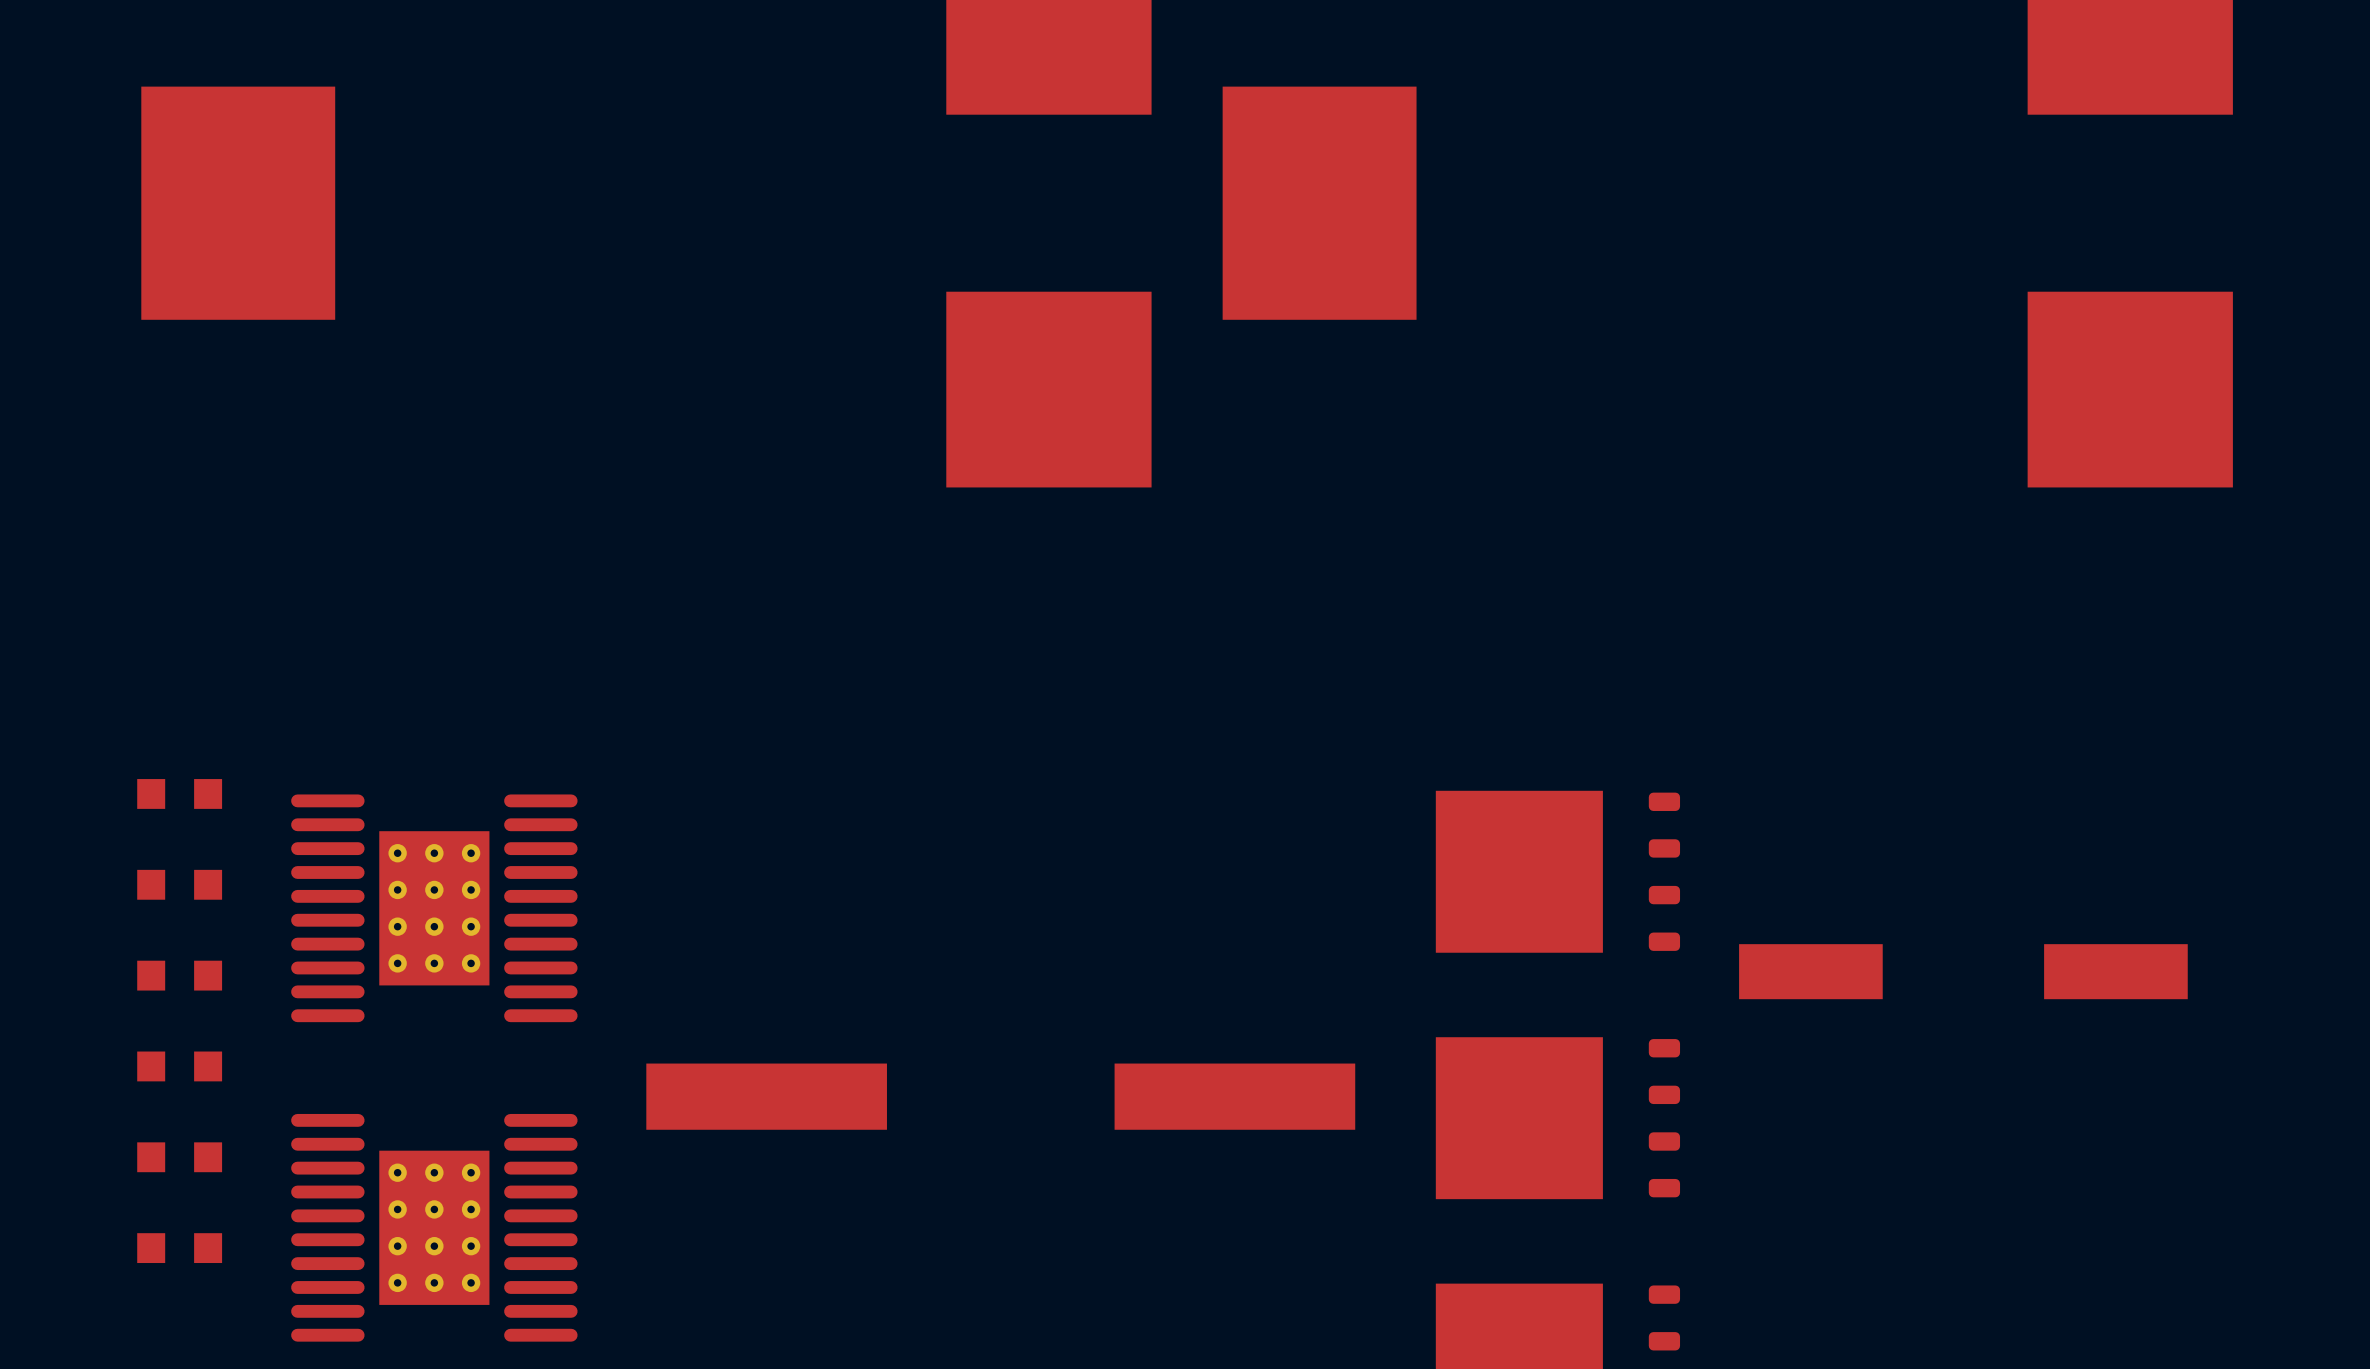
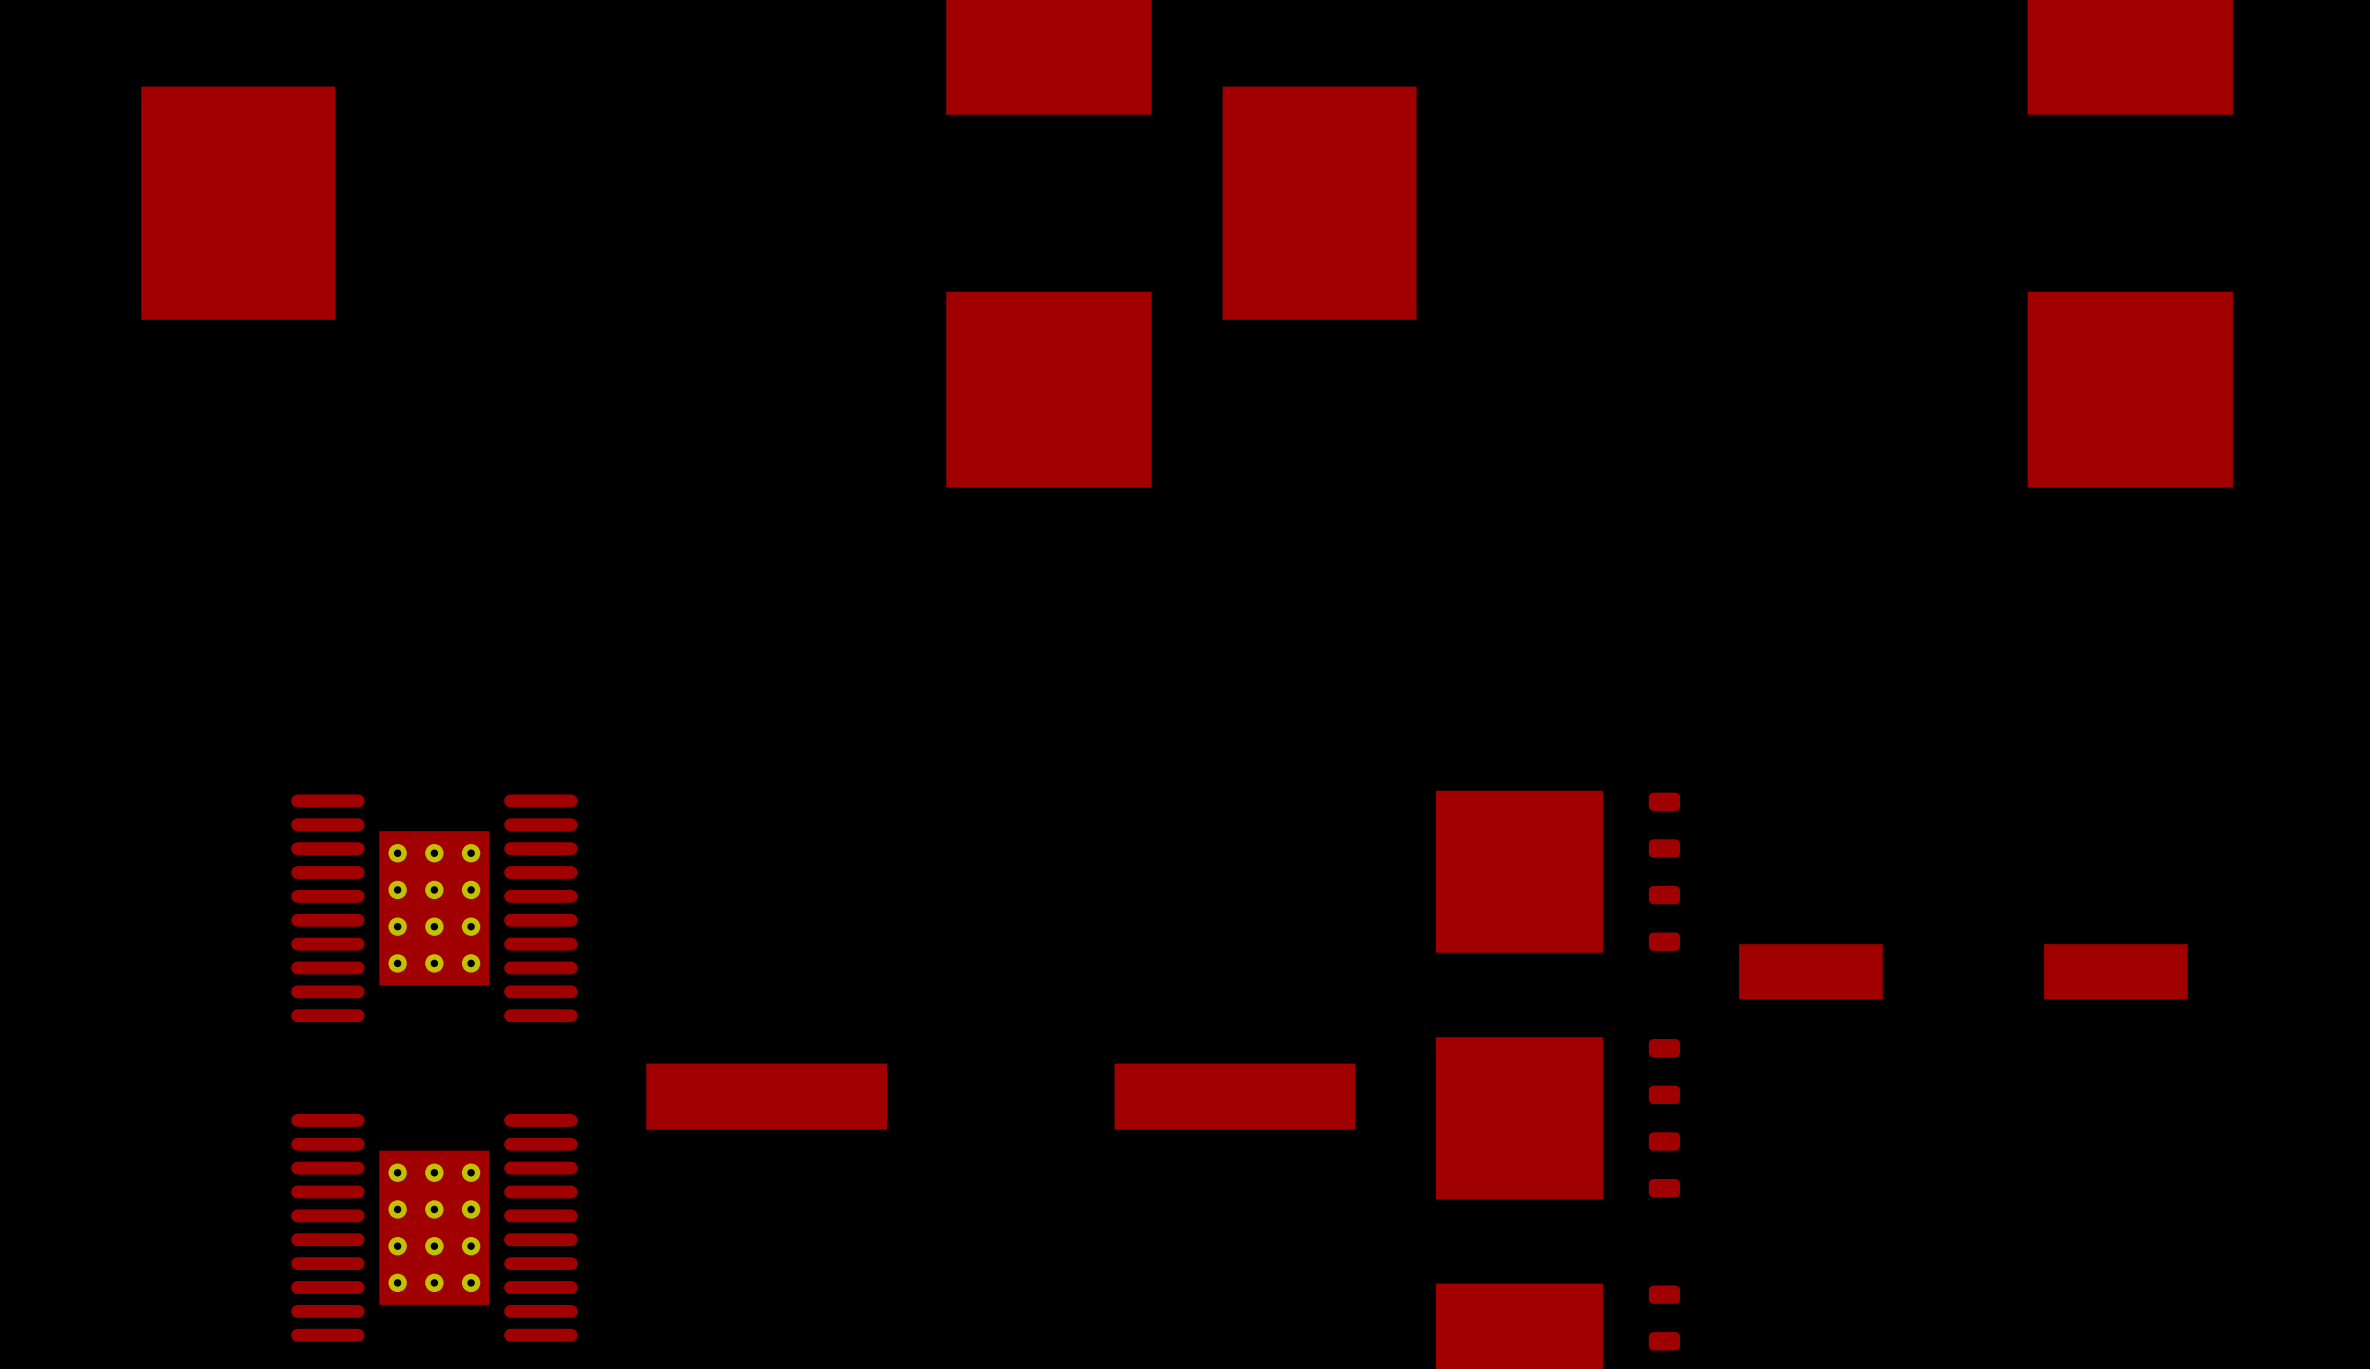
part: (179, 793) -> none
part: (179, 884) -> none
part: (179, 975) -> none
part: (179, 1066) -> none
part: (179, 1157) -> none
part: (179, 1248) -> none

